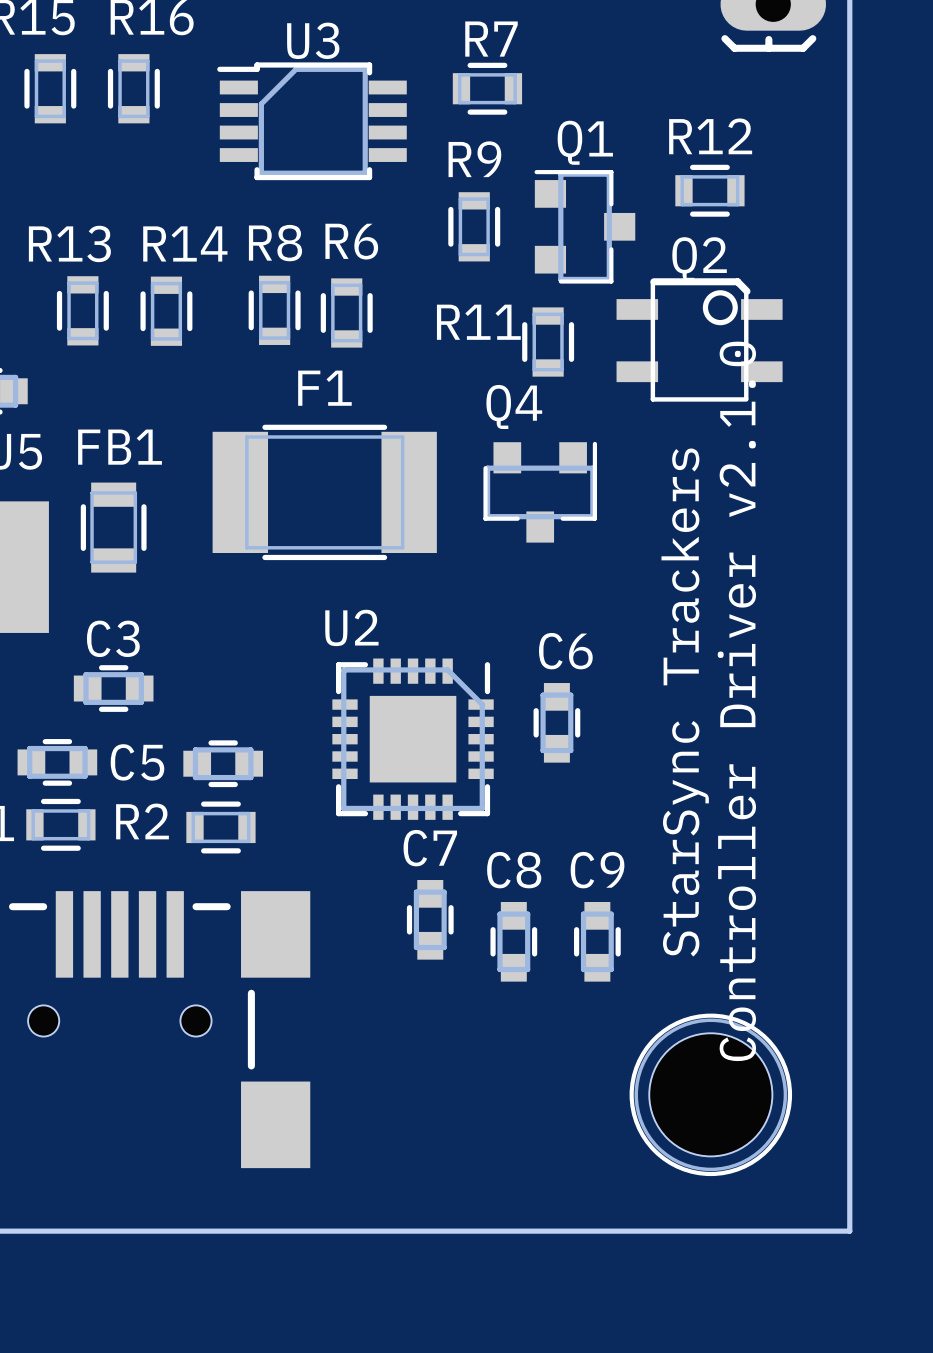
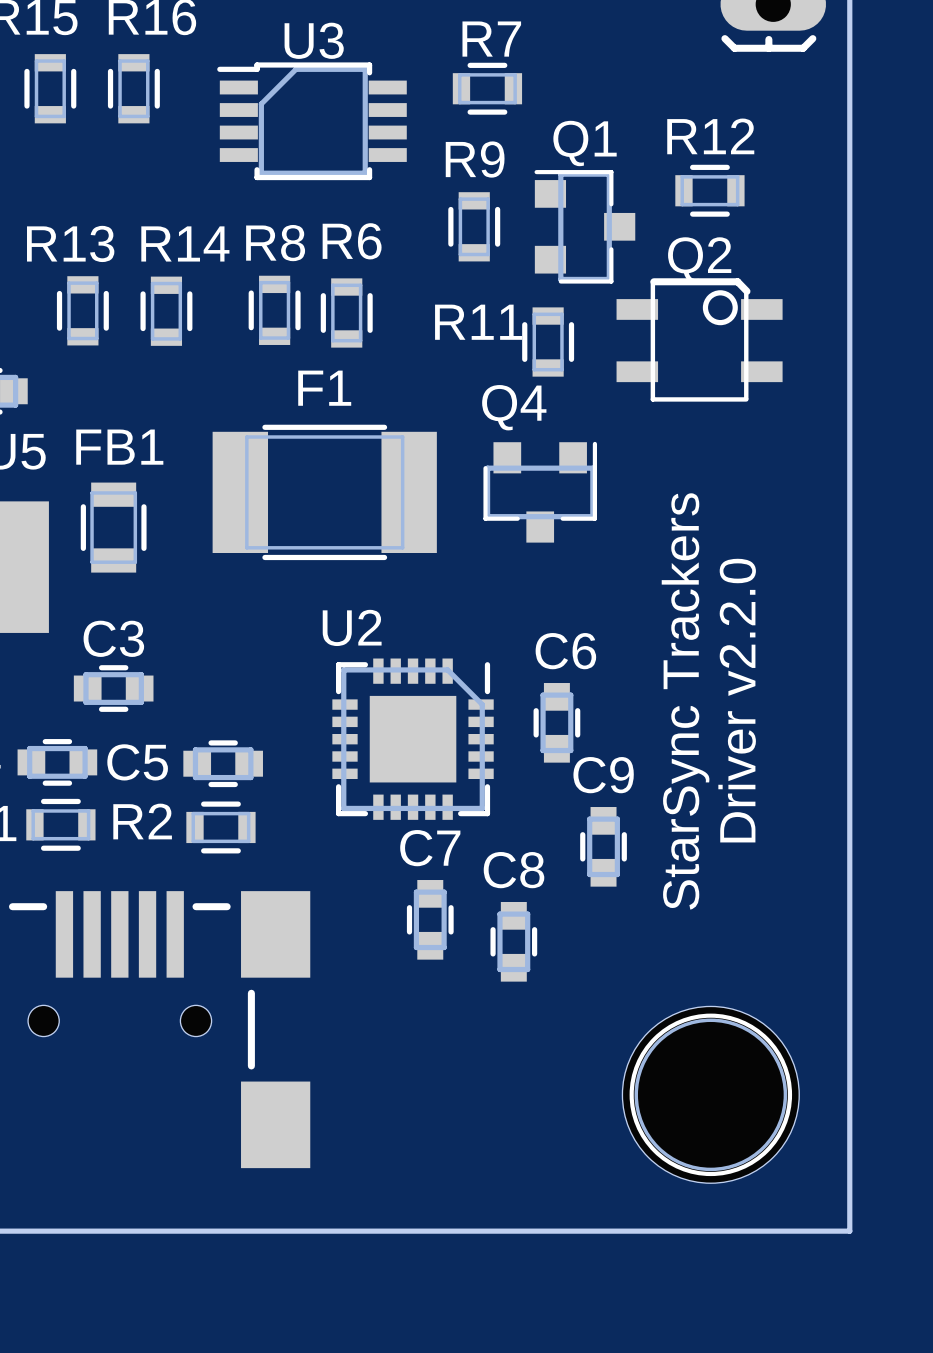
text: Controller Driver v2.1.0 (736, 701) -> Driver v2.2.0 (737, 700)
C9 position: (597, 941) -> (603, 846)
part footprint: [629, 1013, 793, 1177] -> [622, 1006, 800, 1184]

